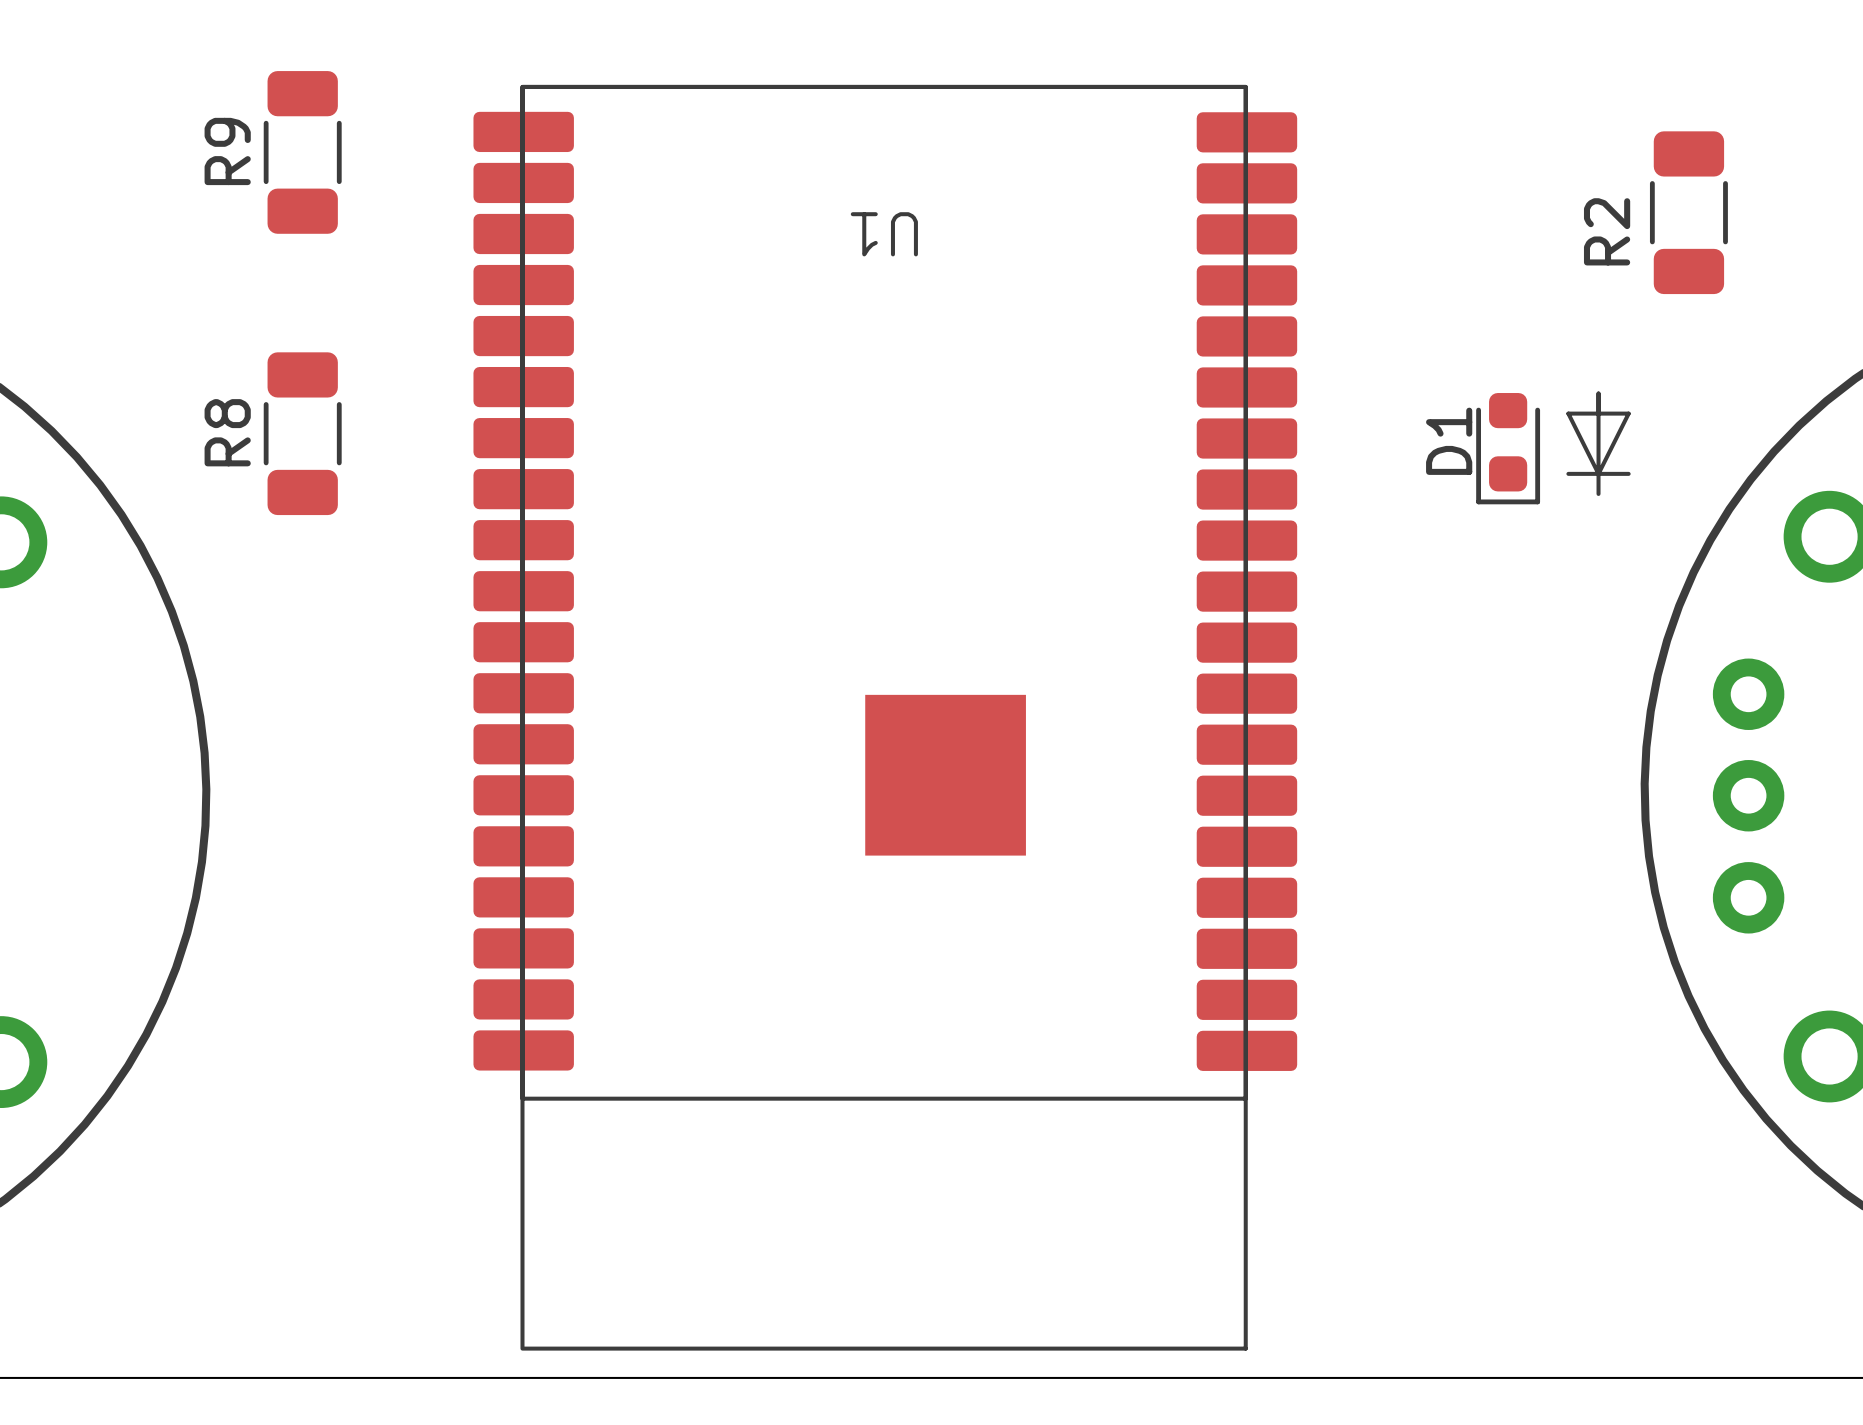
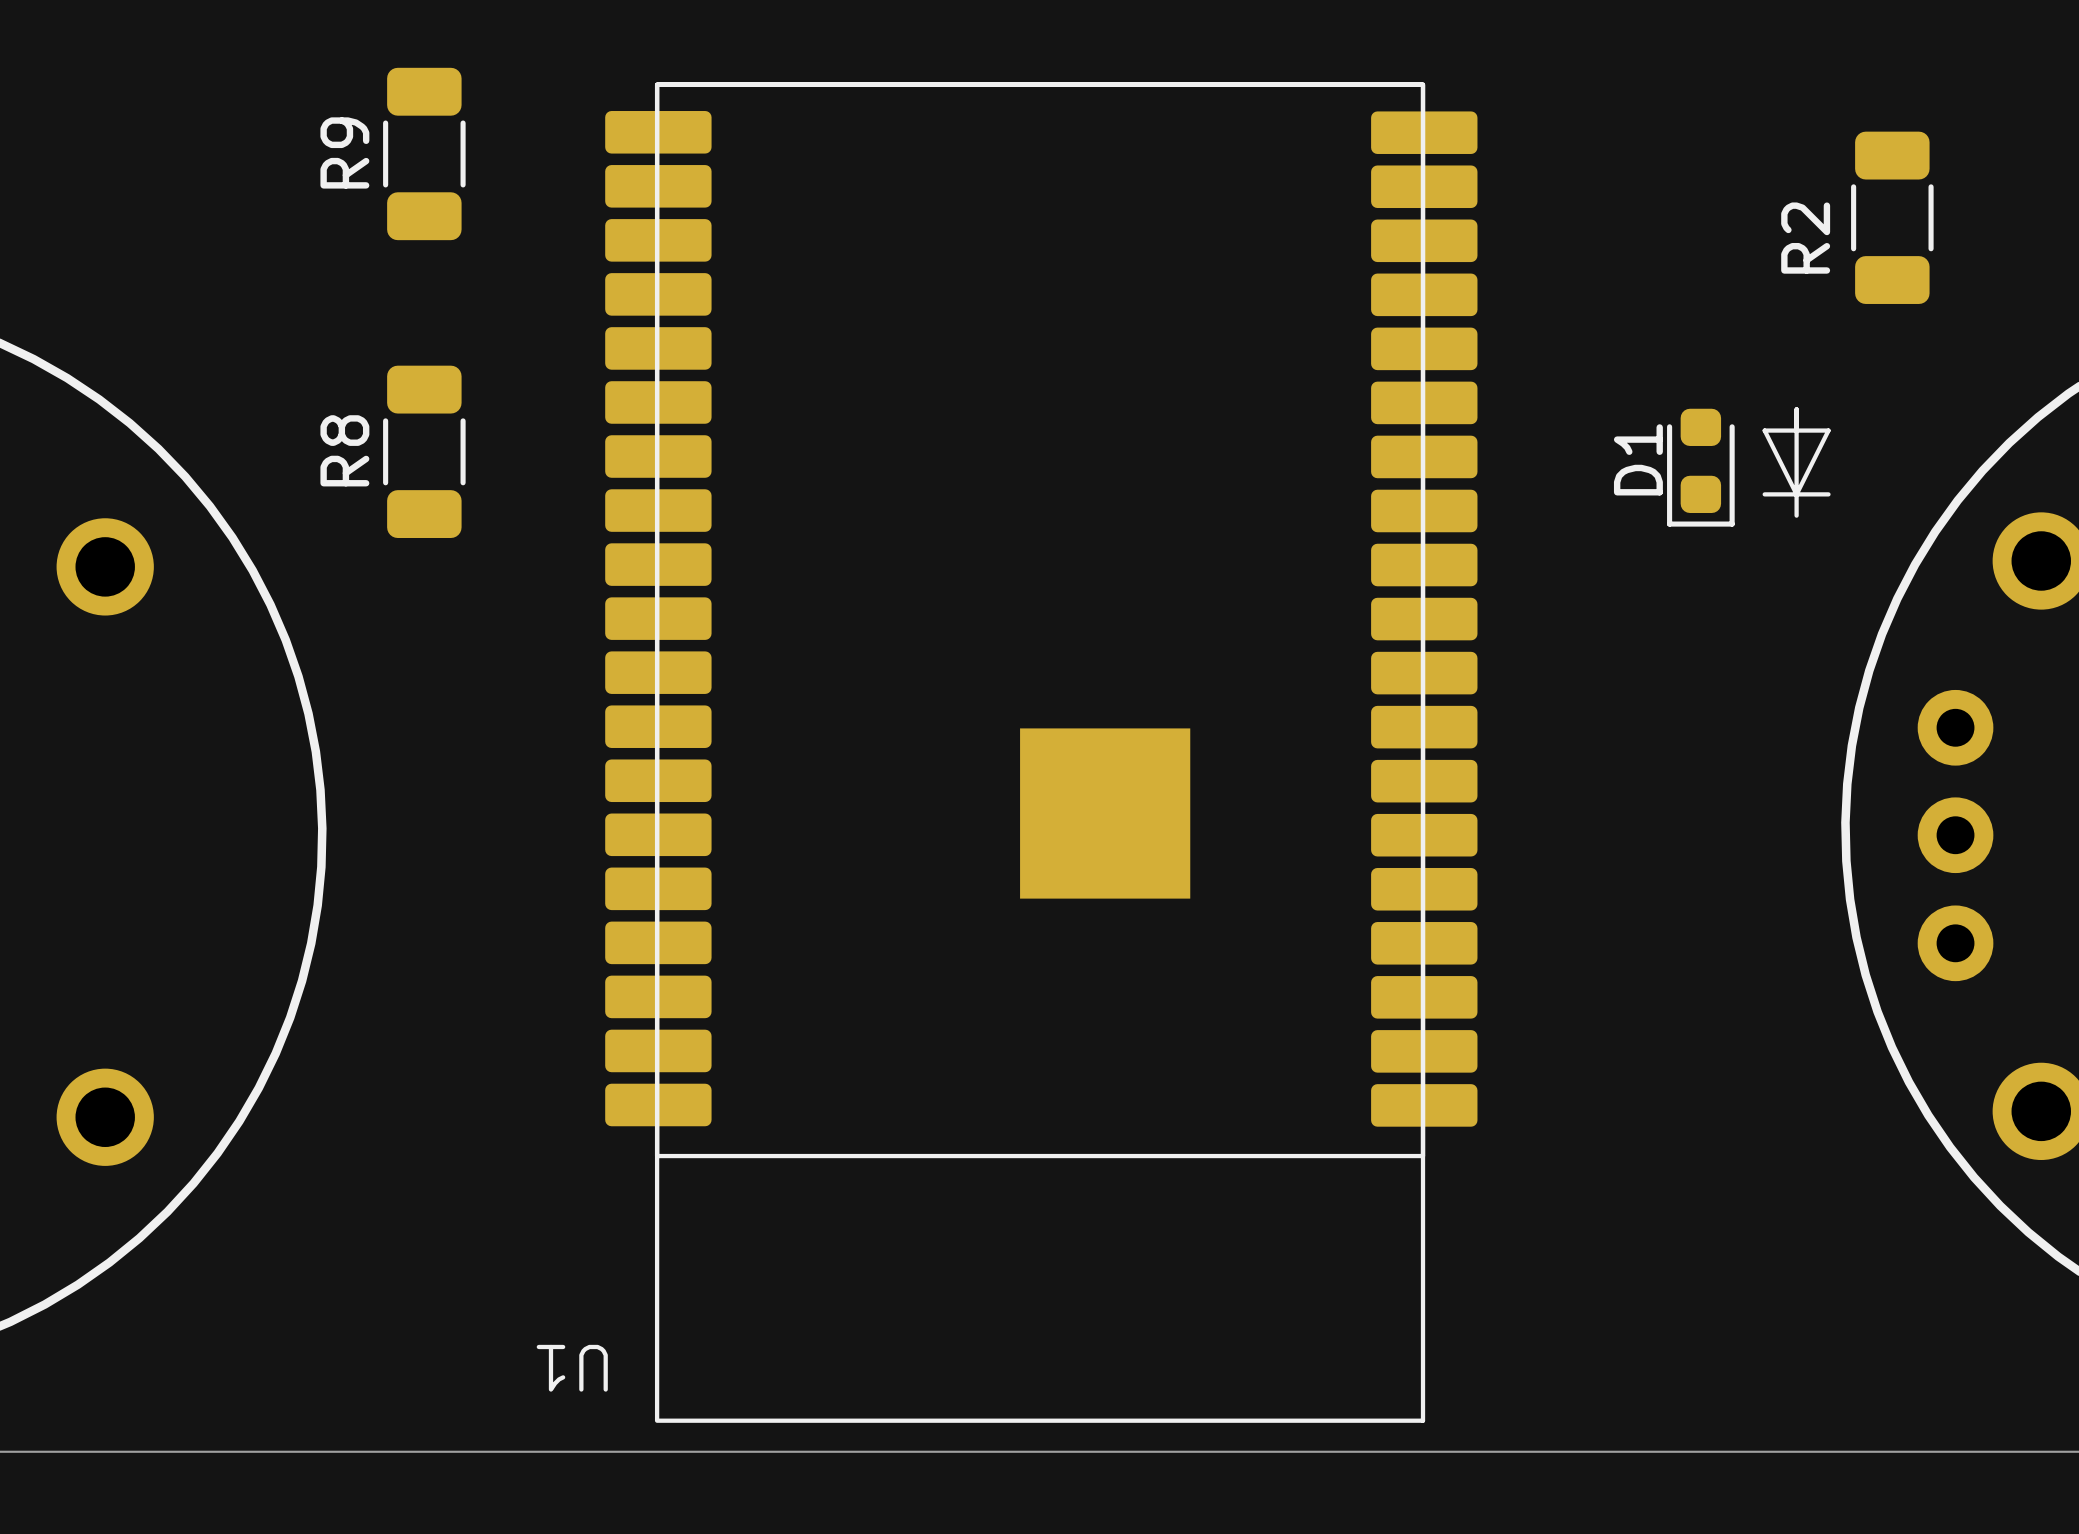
U1 name position: U1 (884, 234) -> U1 (572, 1368)

